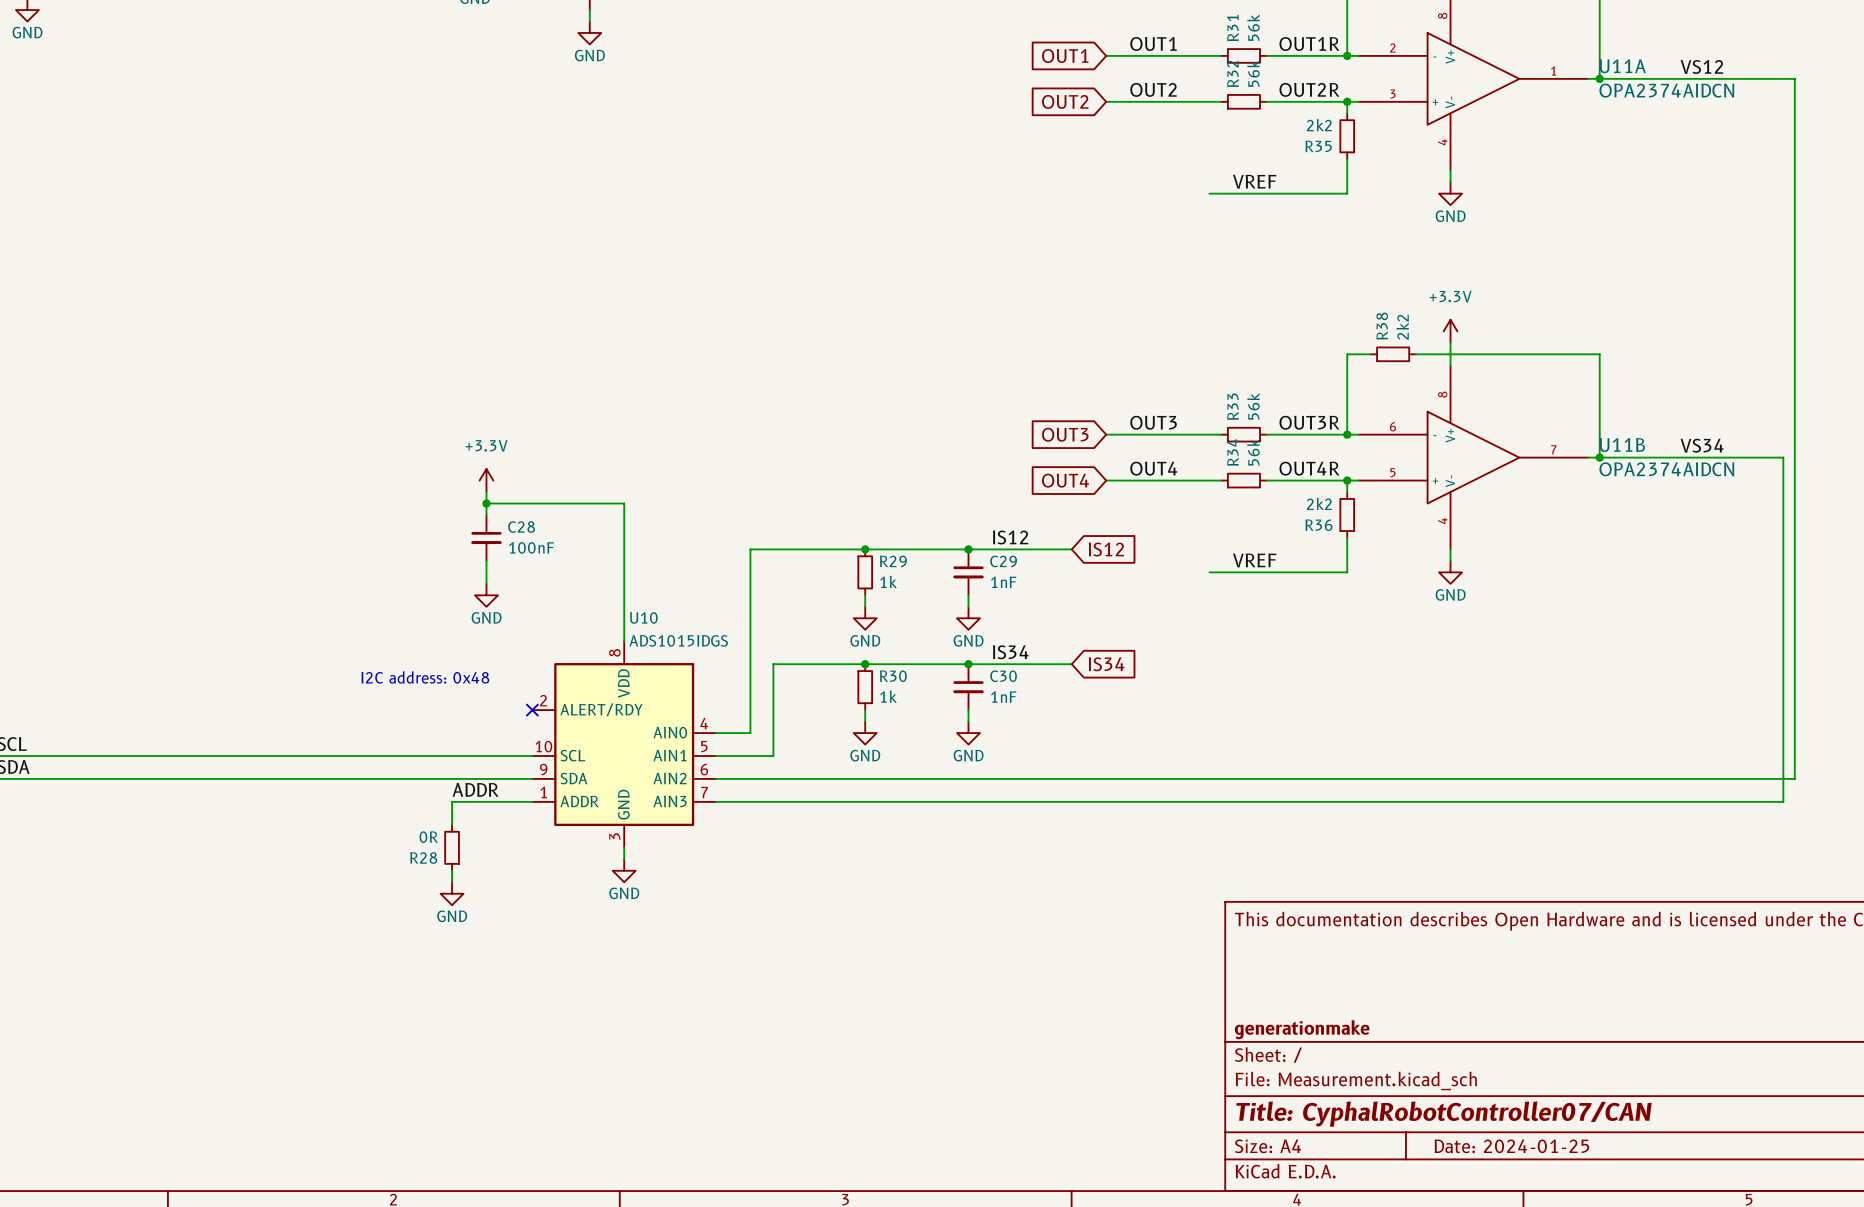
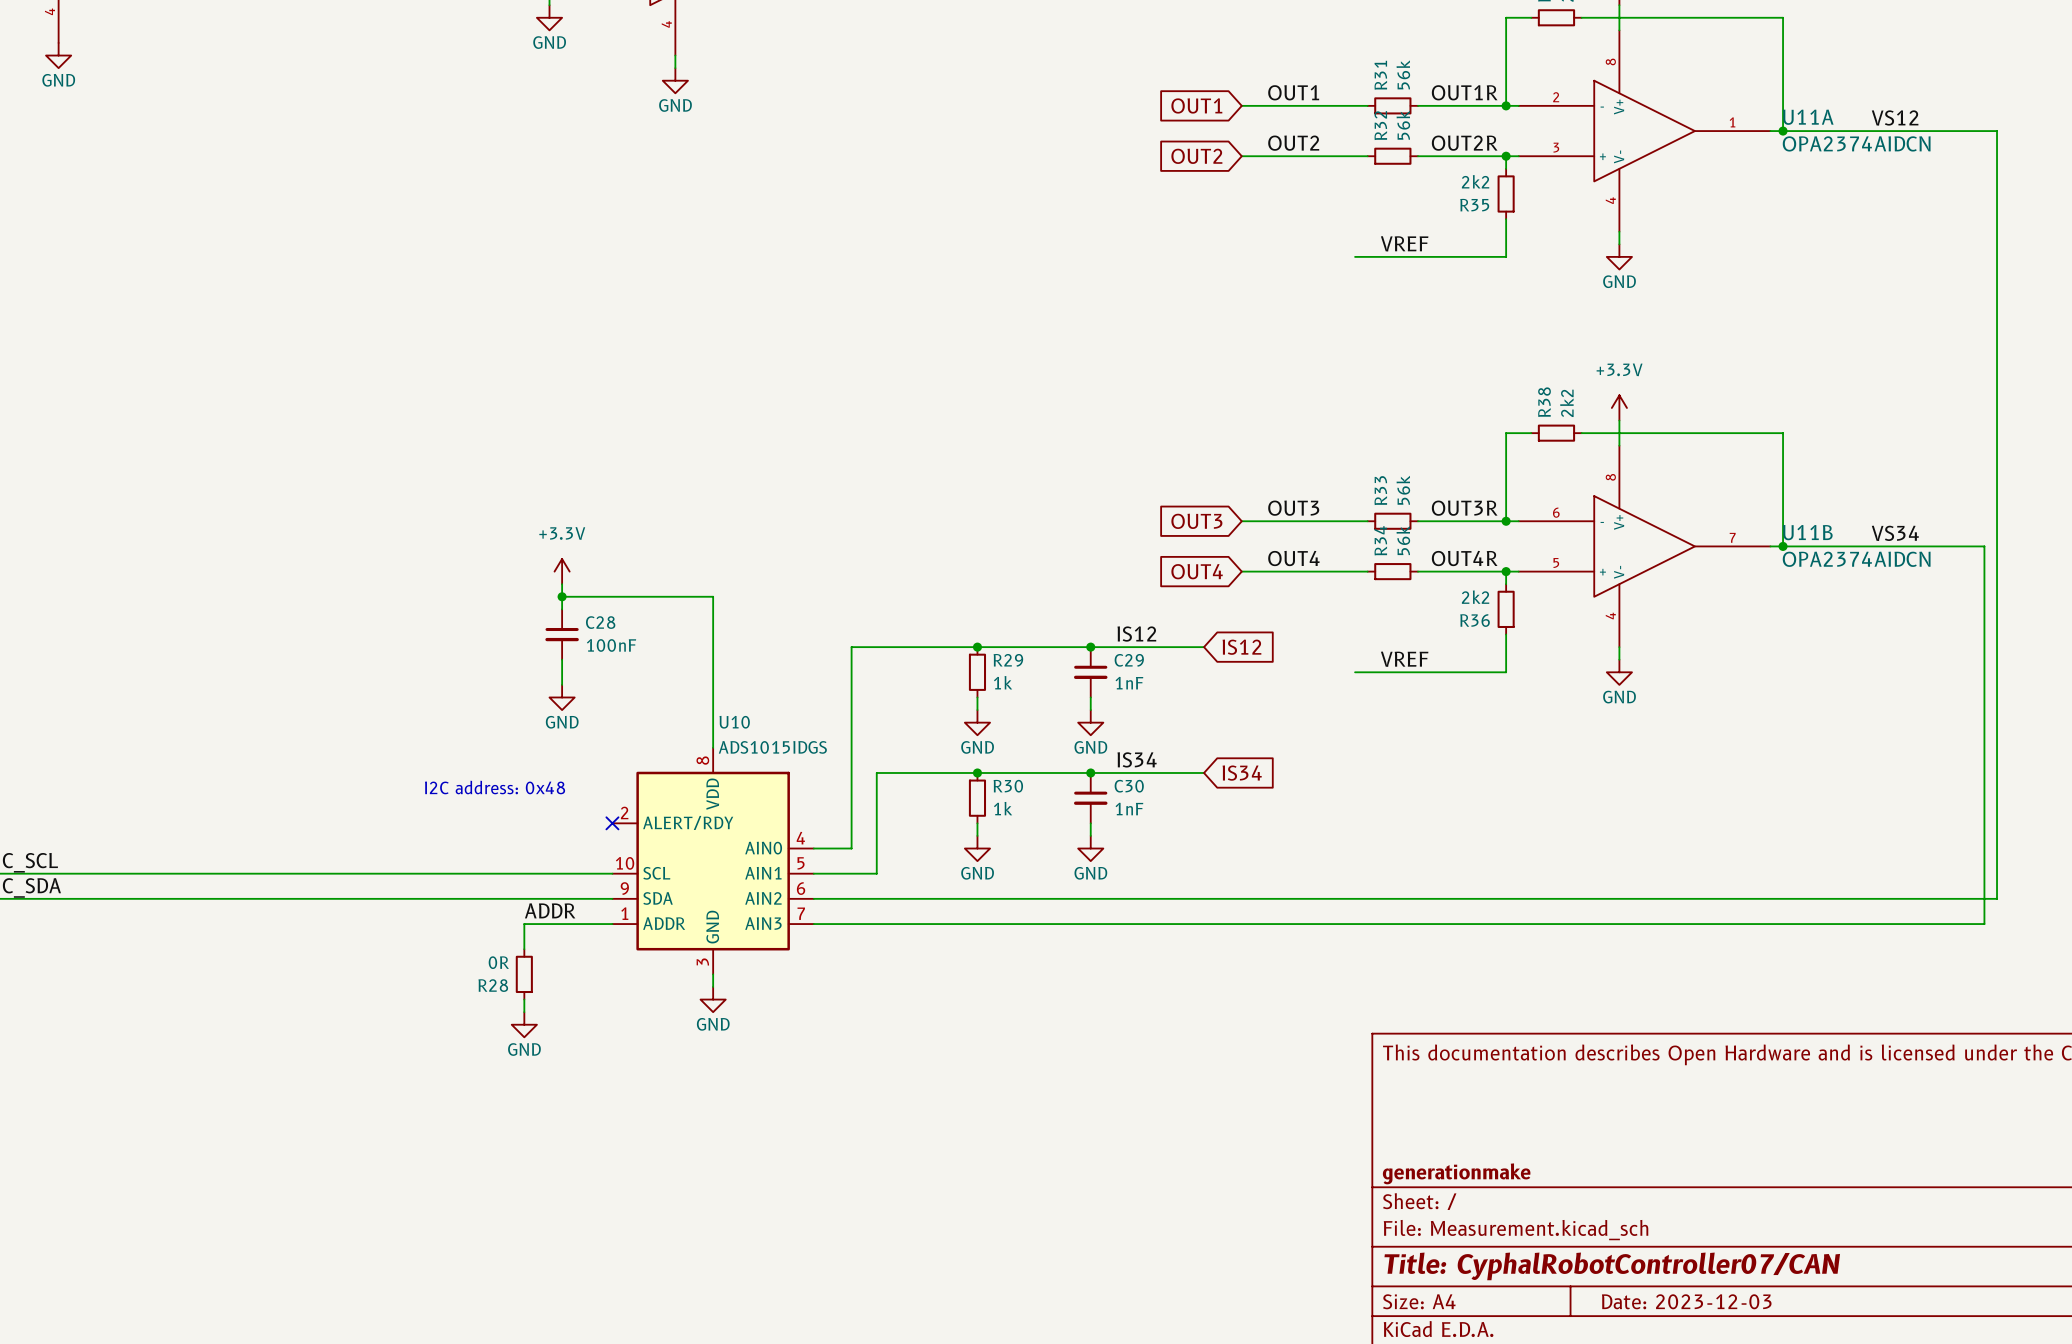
title block: Date: 2024-01-25 (1511, 1146) -> Date: 2023-12-03 (1686, 1301)

